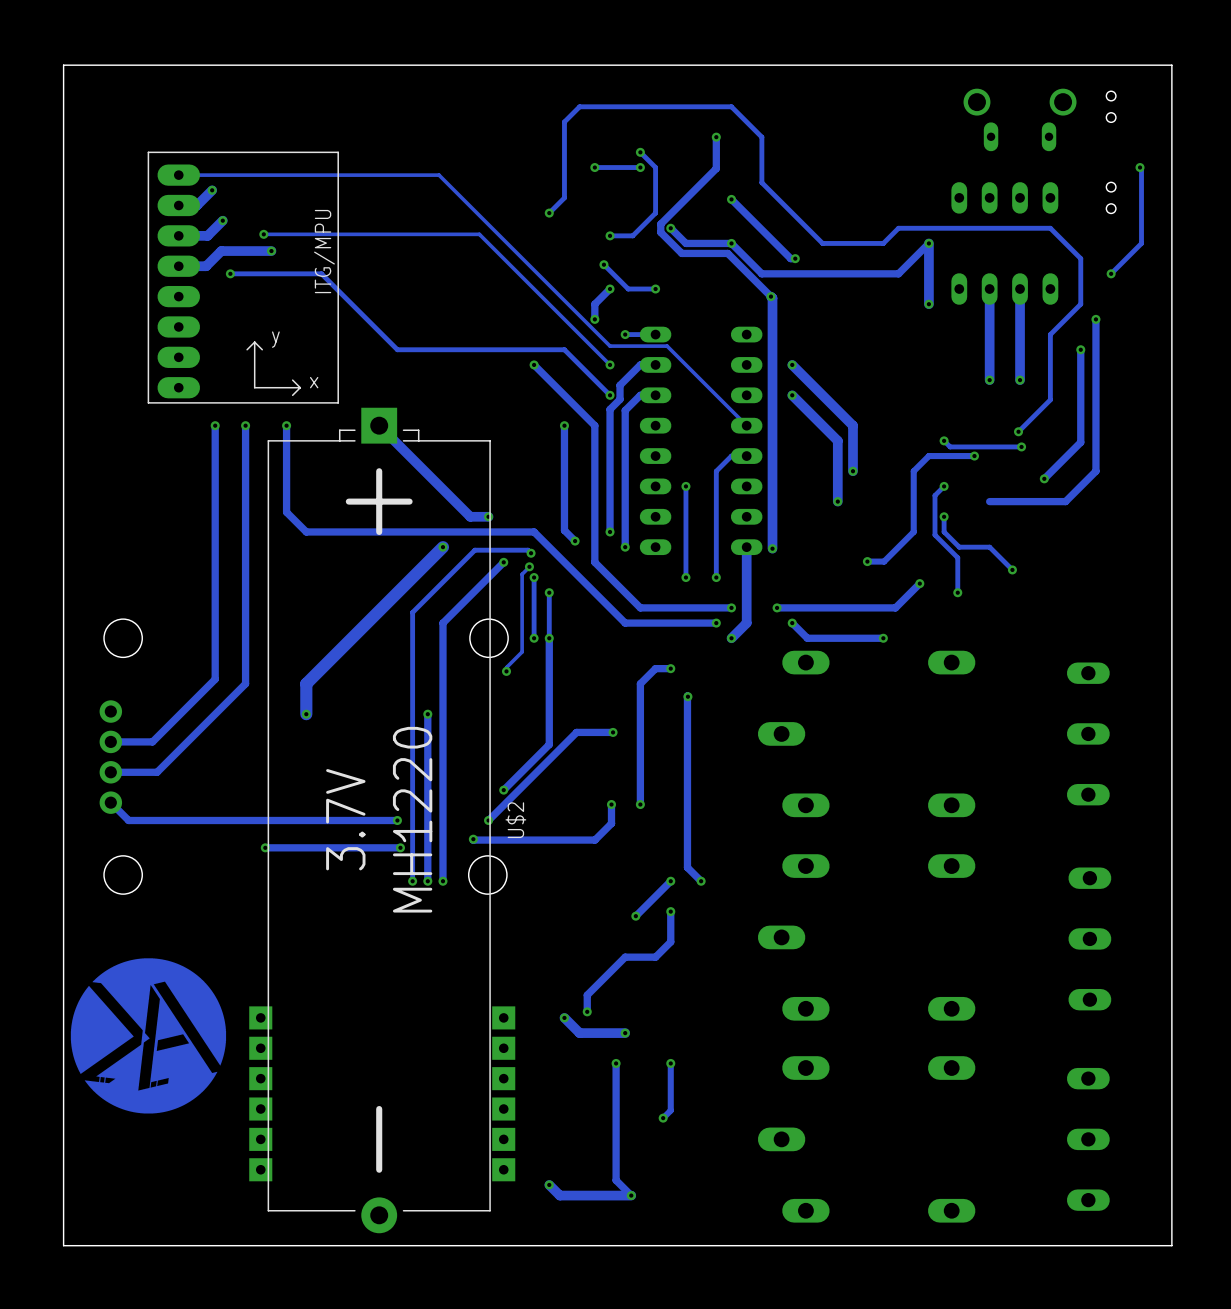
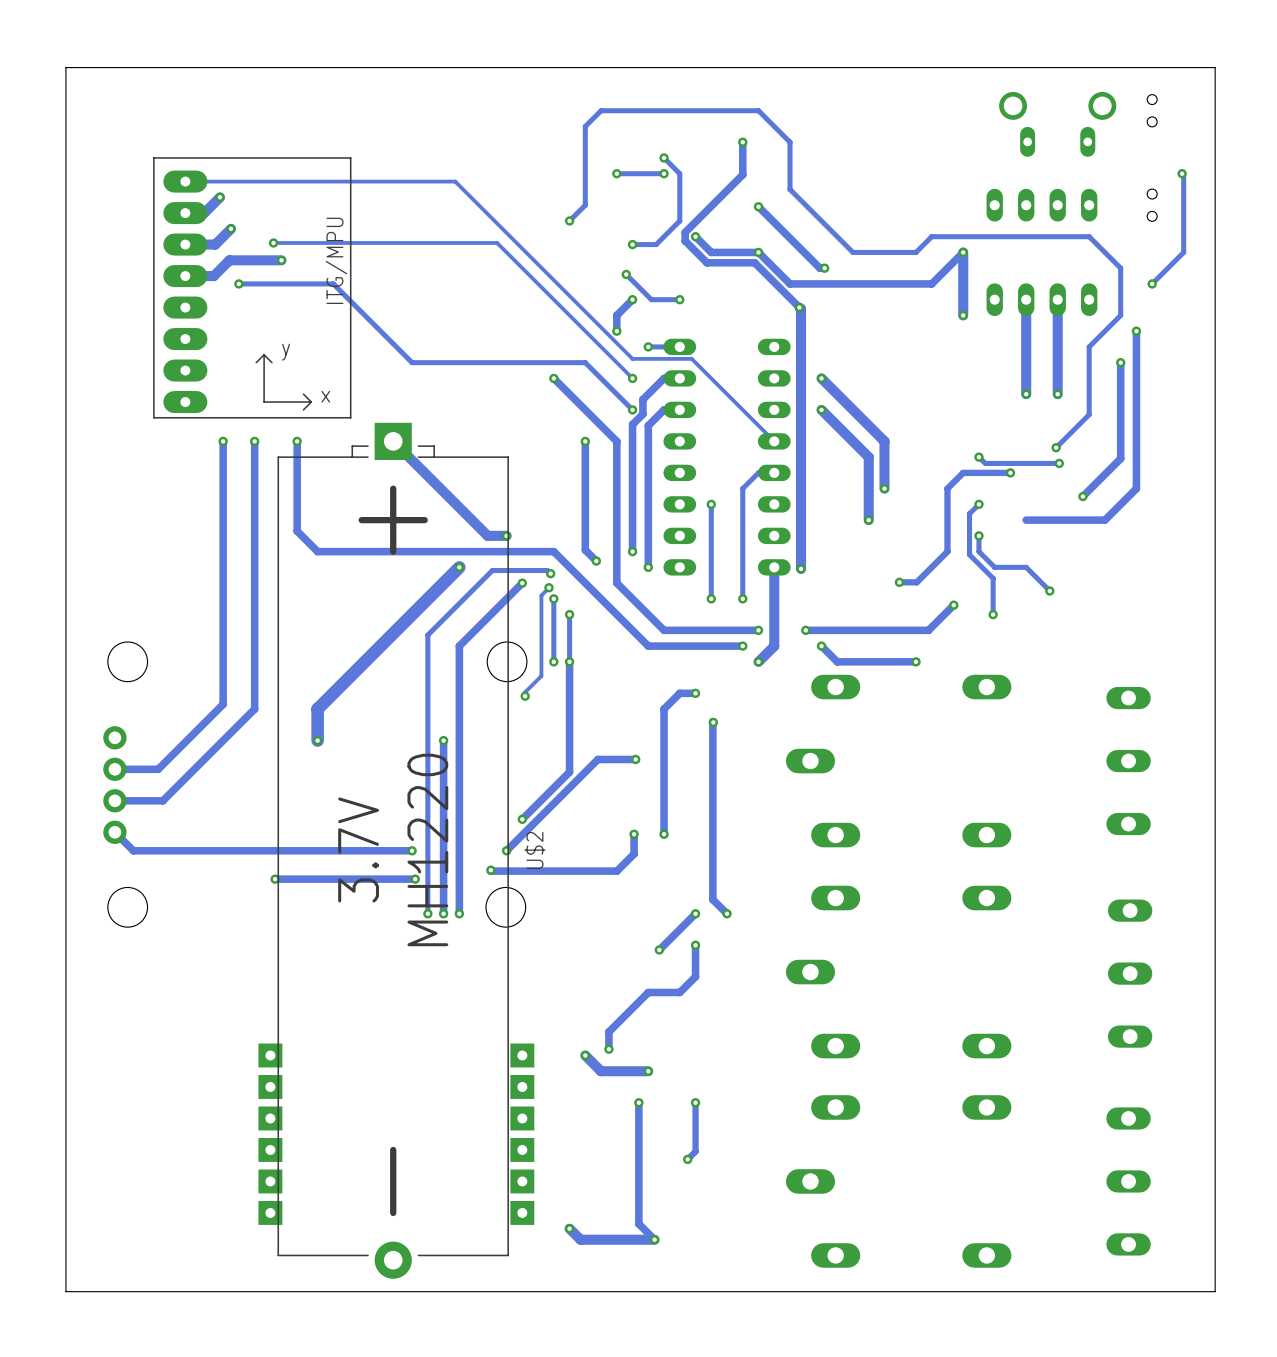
drawing: [70, 958, 227, 1114] -> none

